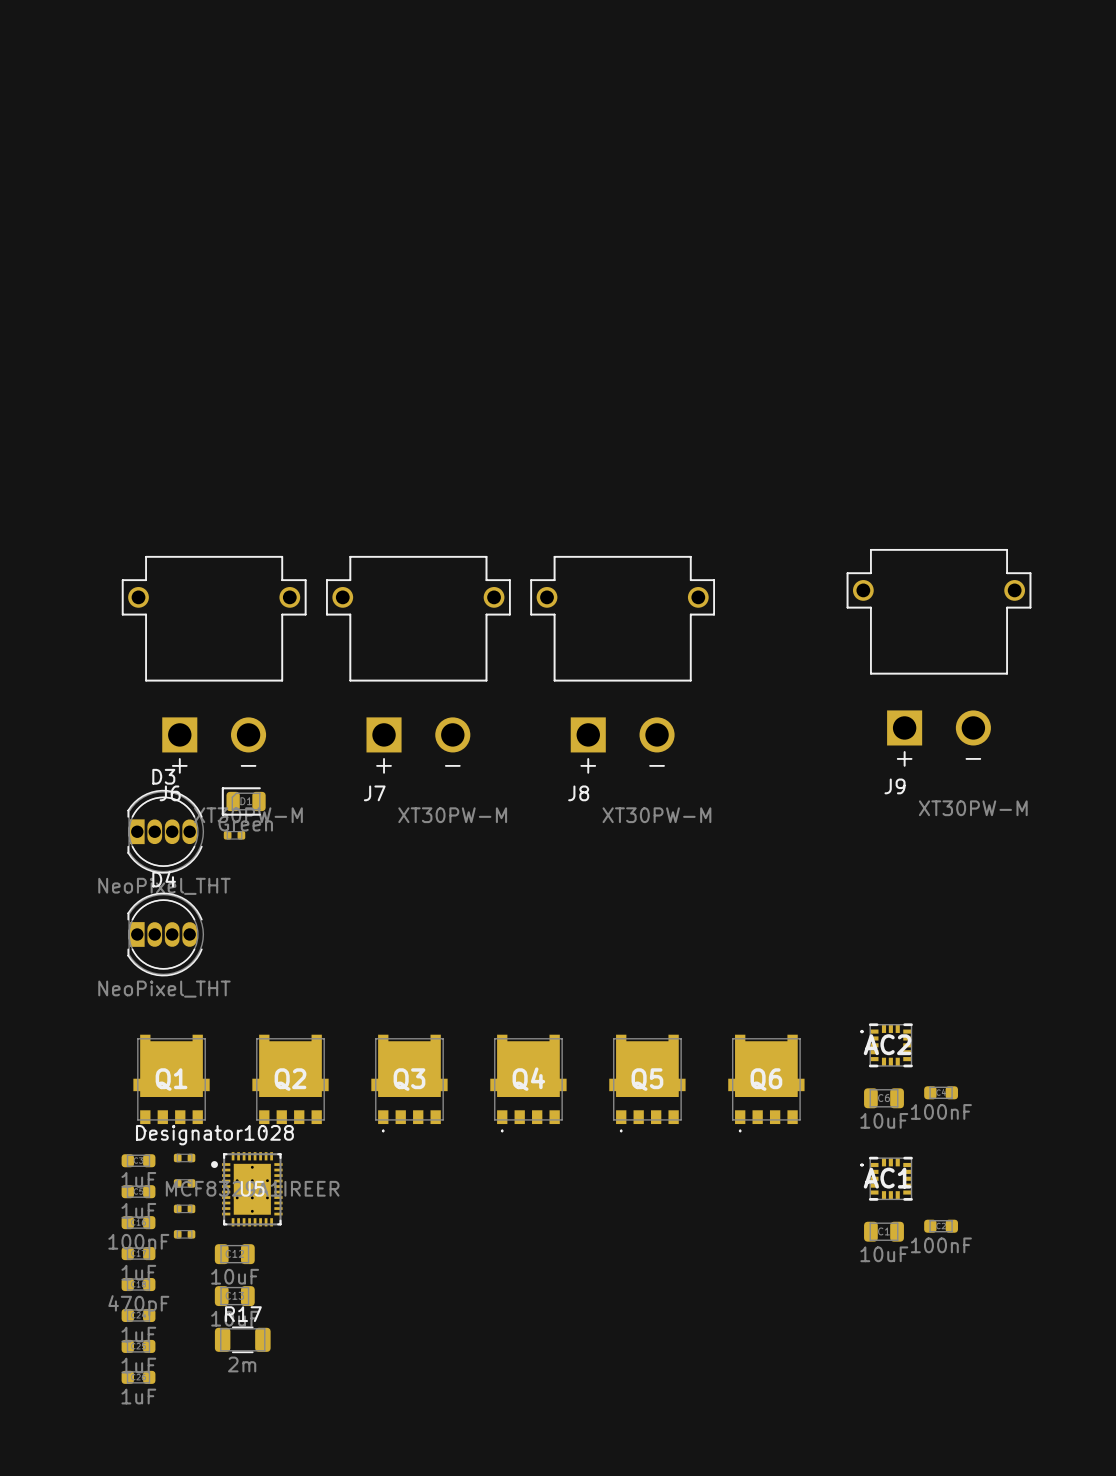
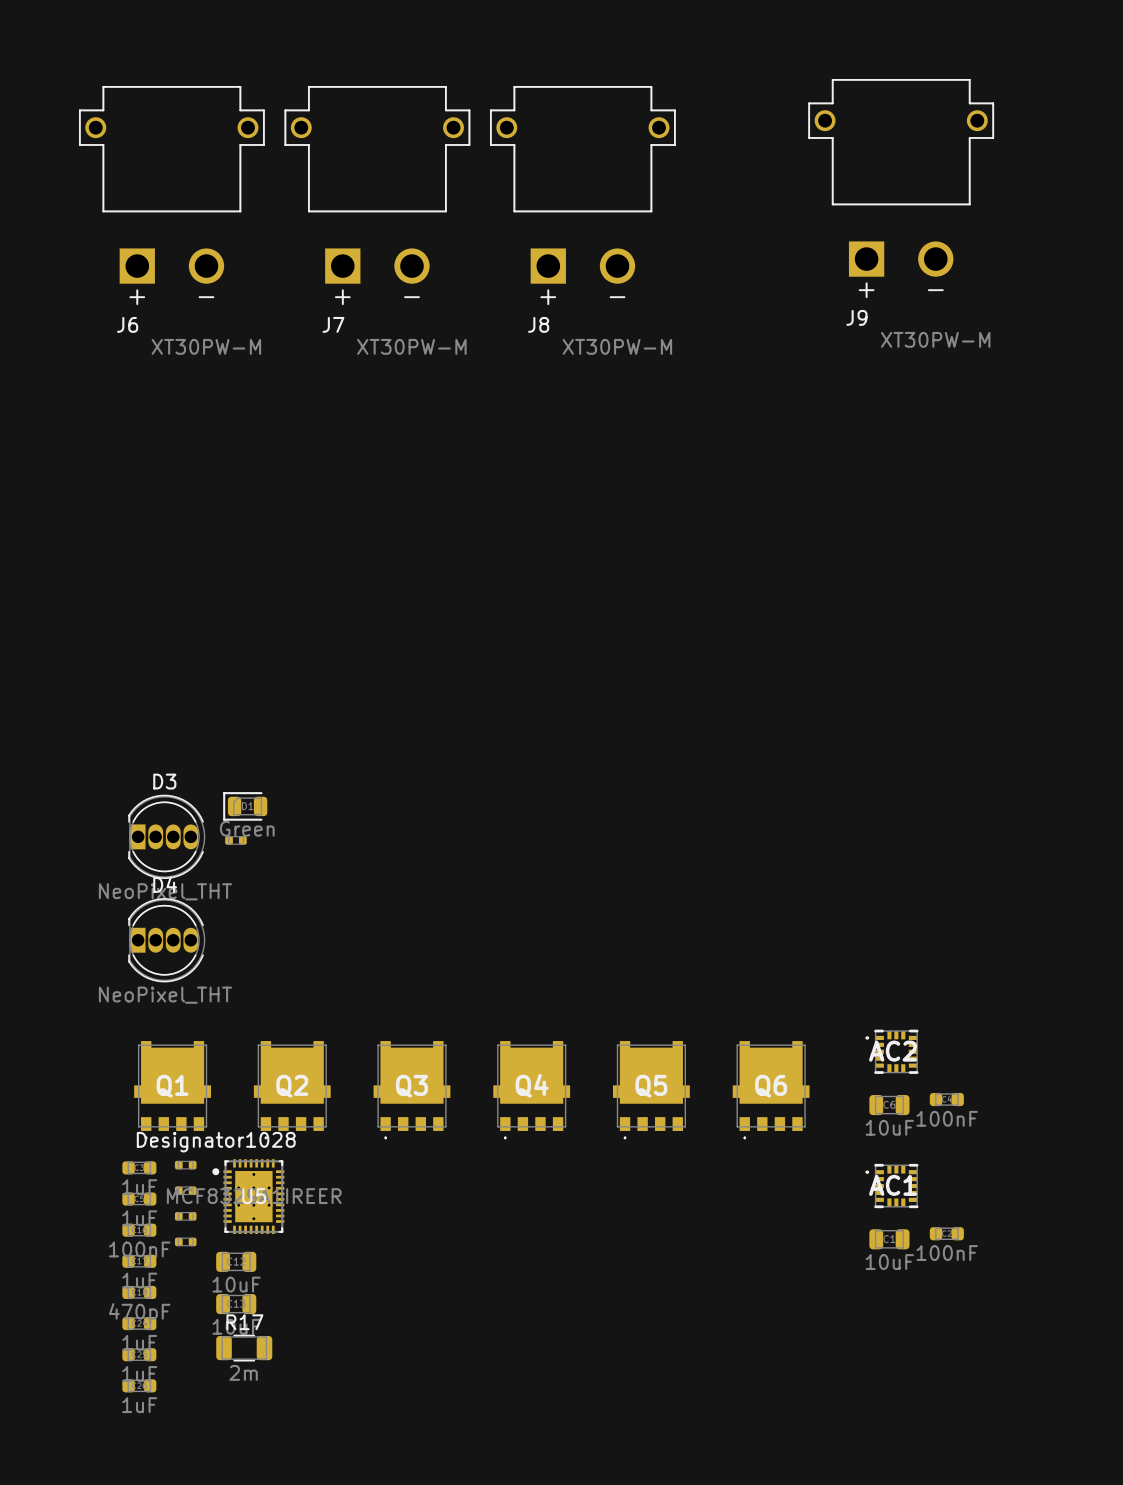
J9 position: (939, 657) -> (901, 188)
J6 position: (214, 664) -> (171, 195)
J7 position: (418, 664) -> (377, 195)
J8 position: (622, 664) -> (582, 195)

